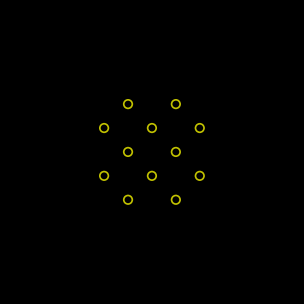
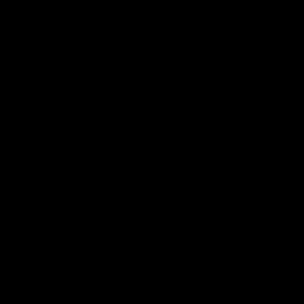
part: (151, 151) -> none

